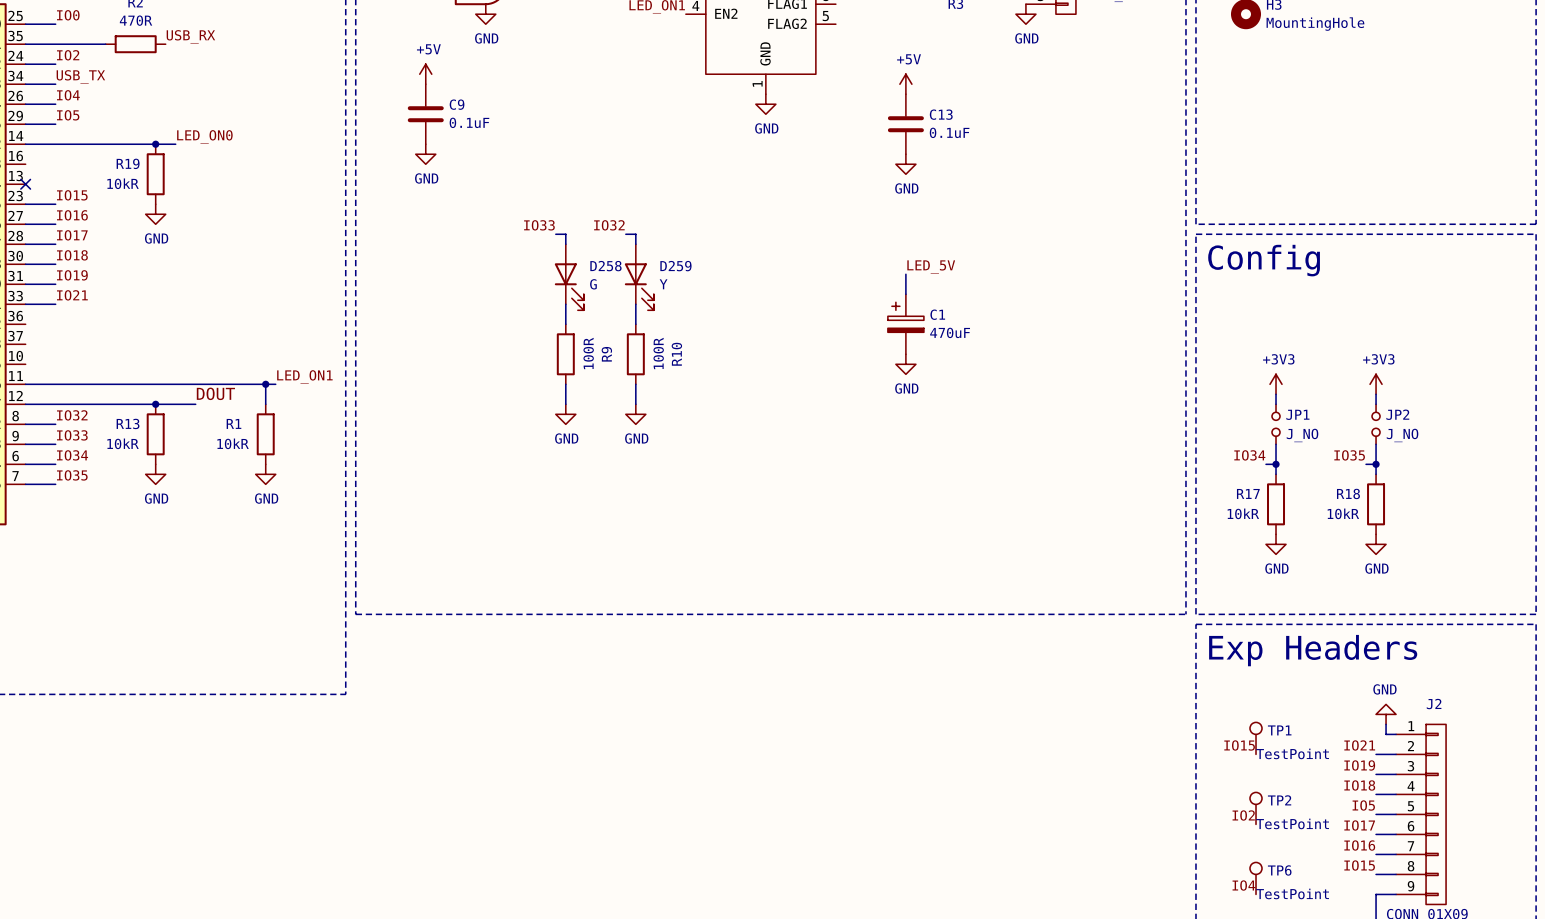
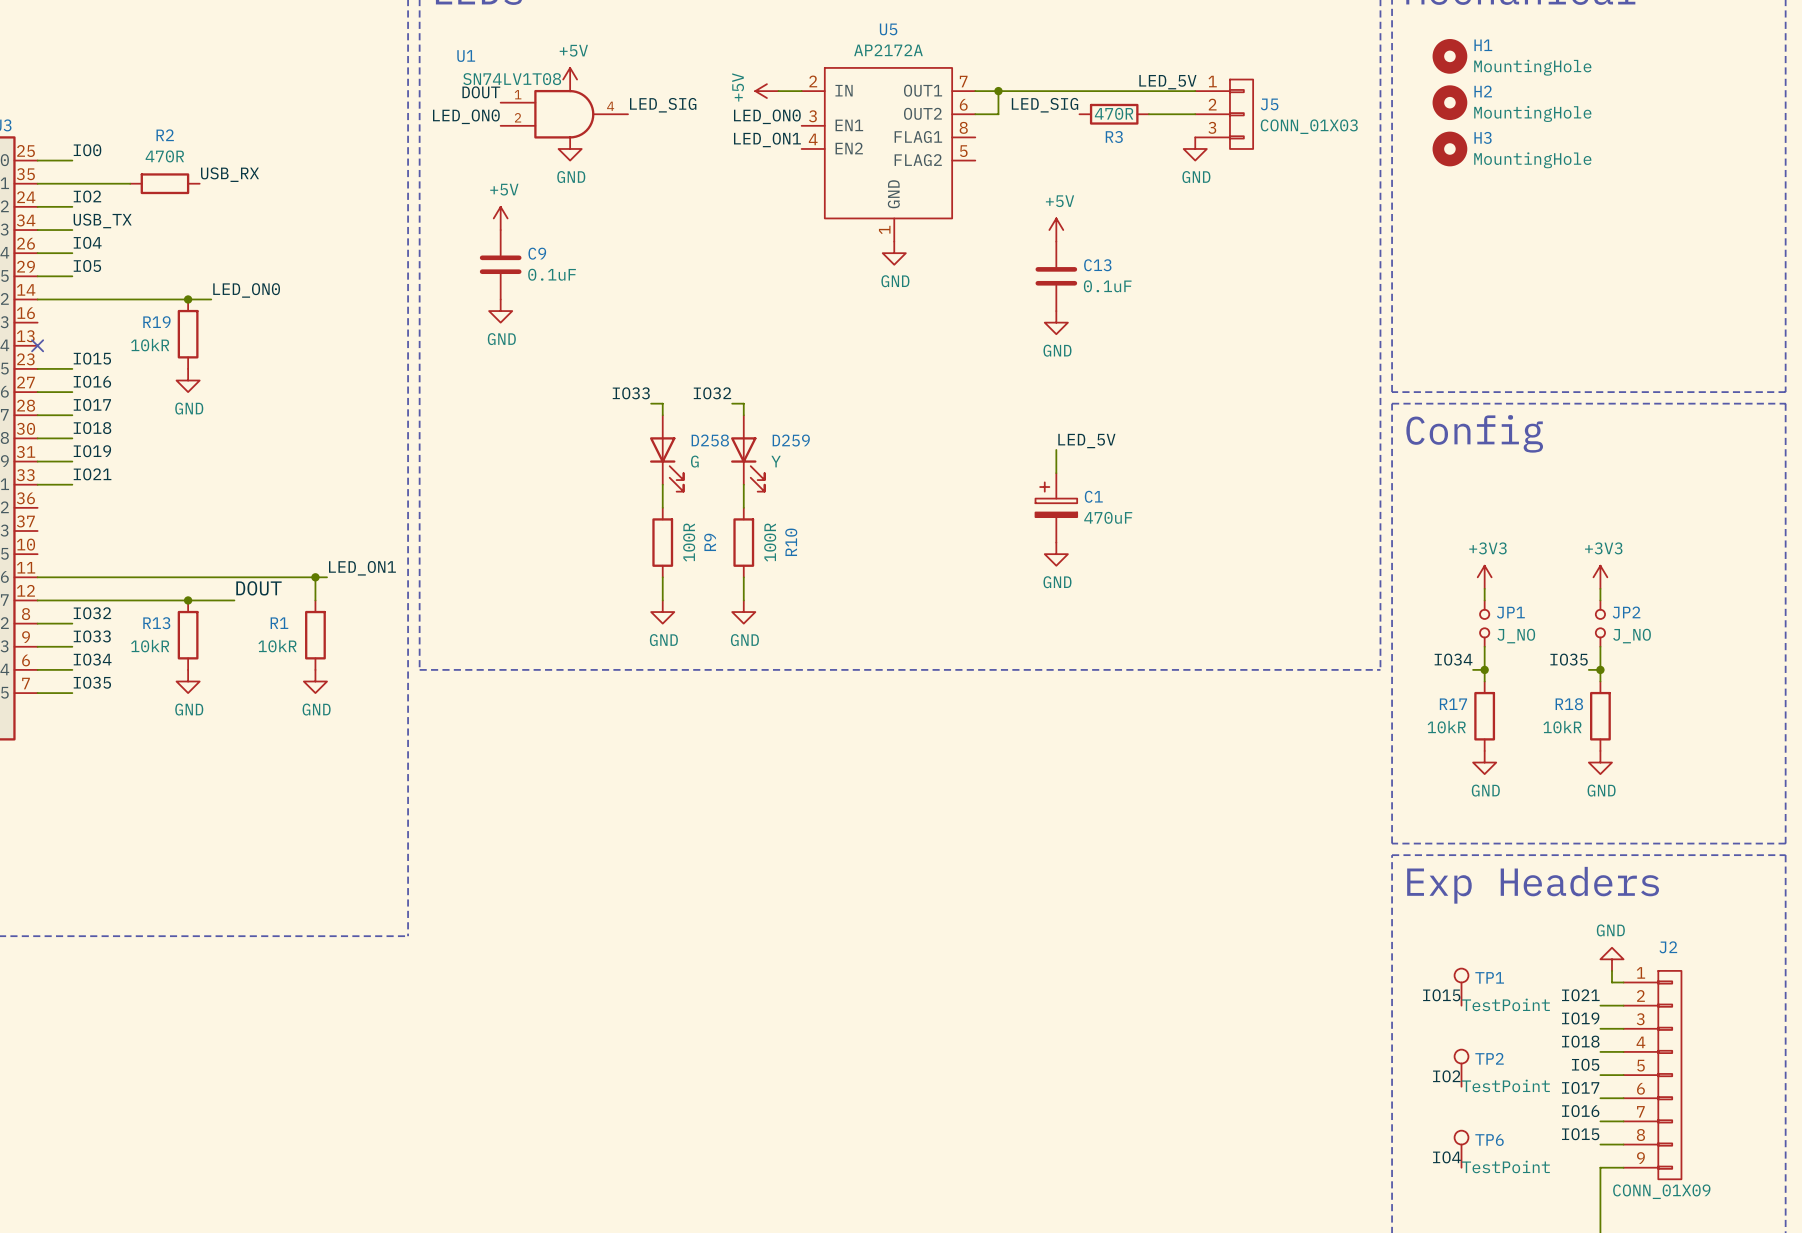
line: (355, 464) (355, 614) (1185, 614) (1185, 464) -> (419, 669) (1380, 669)

